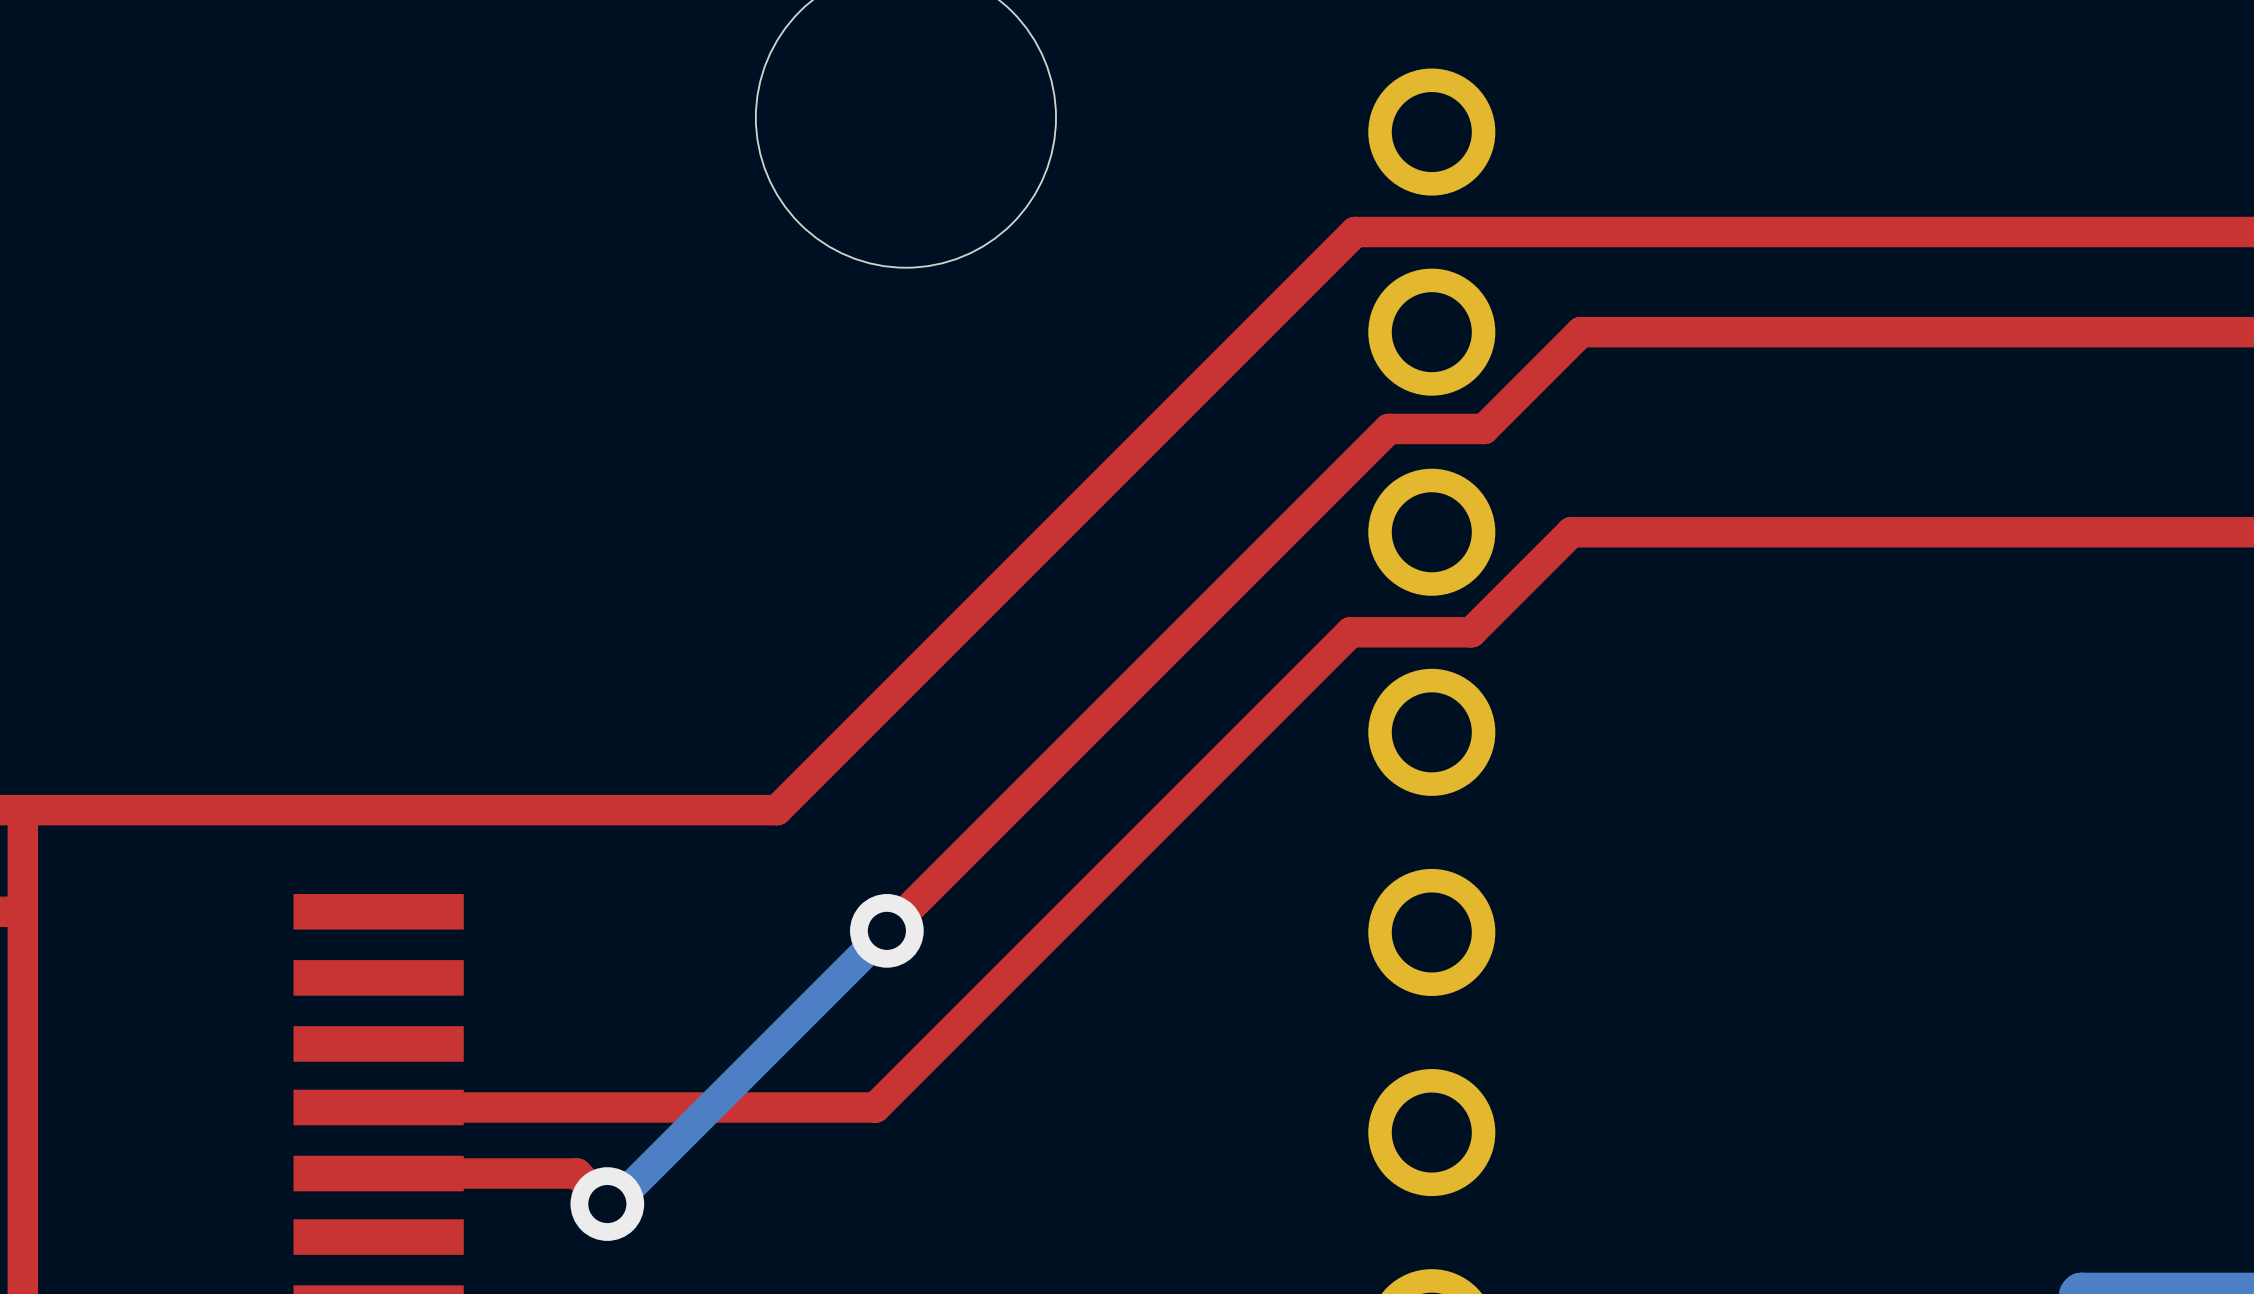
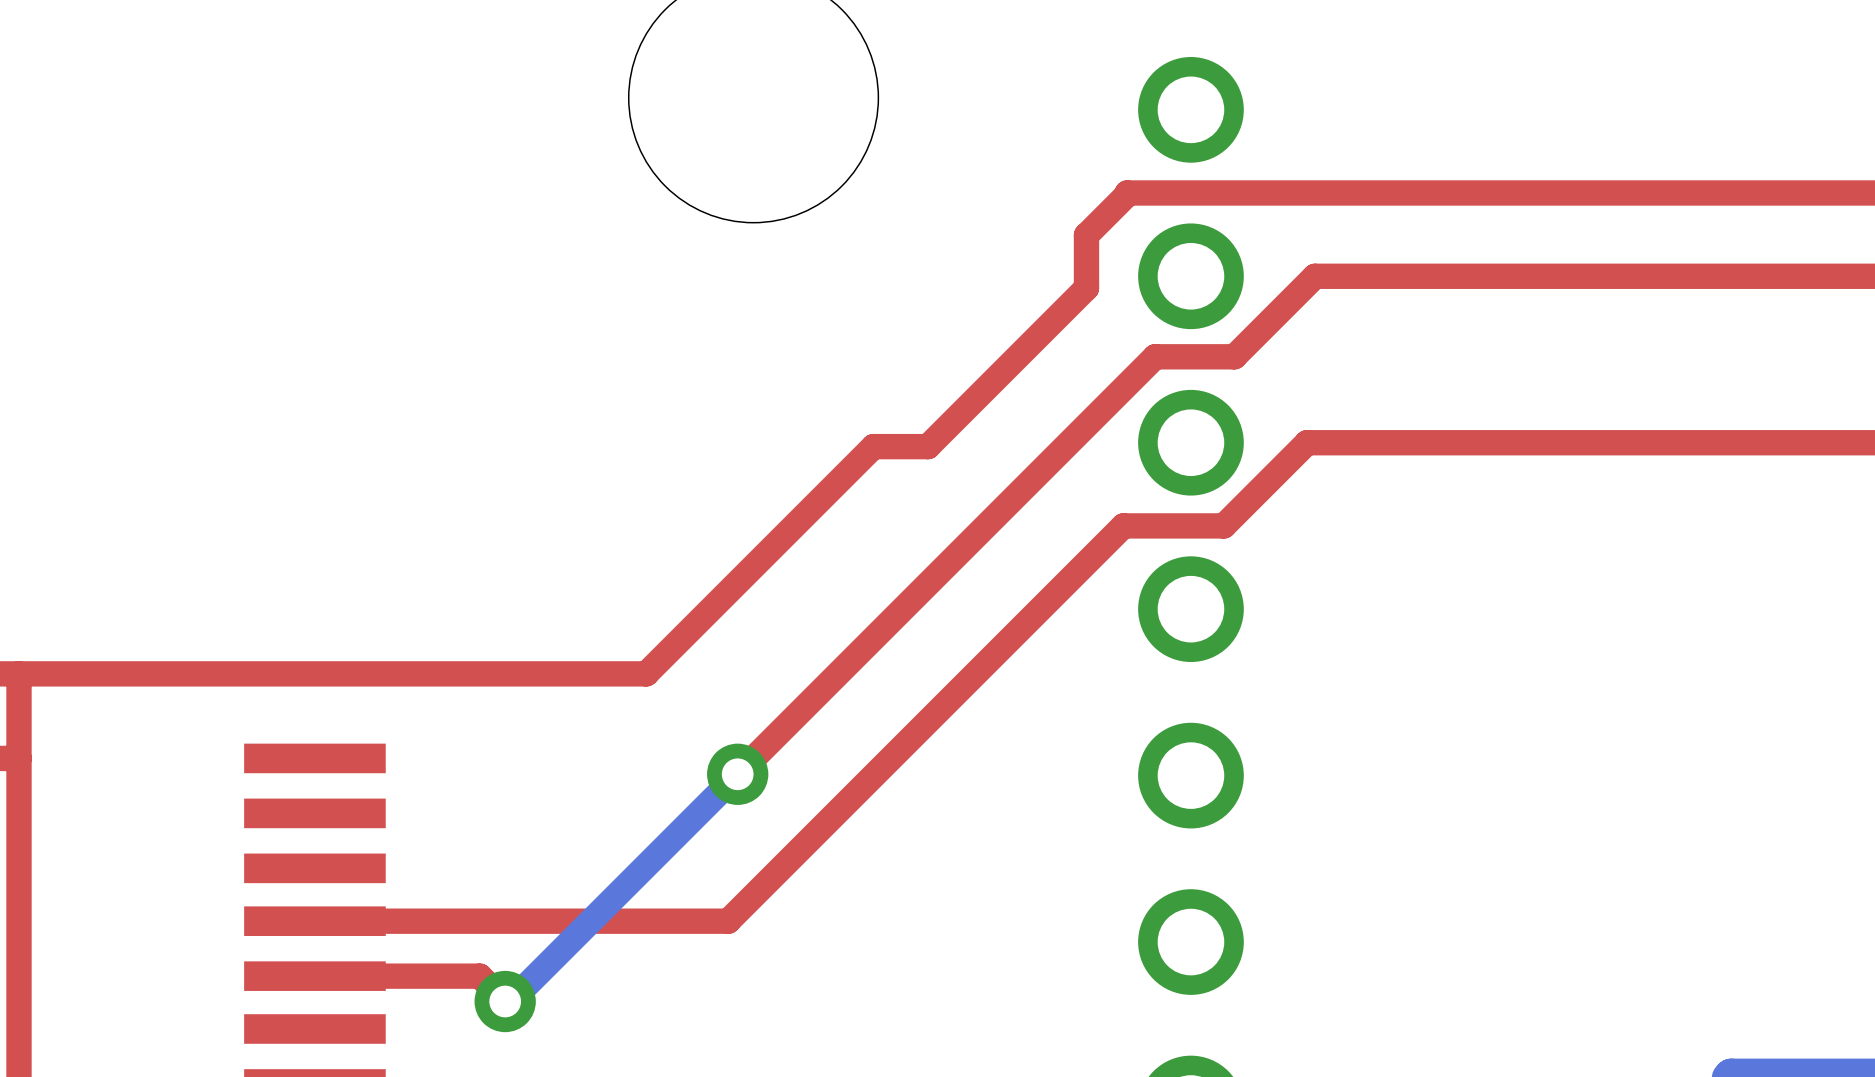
top track: (1355, 232) (1050, 536) -> (1127, 194) (1086, 235) (1086, 288) (927, 446) (873, 446)

